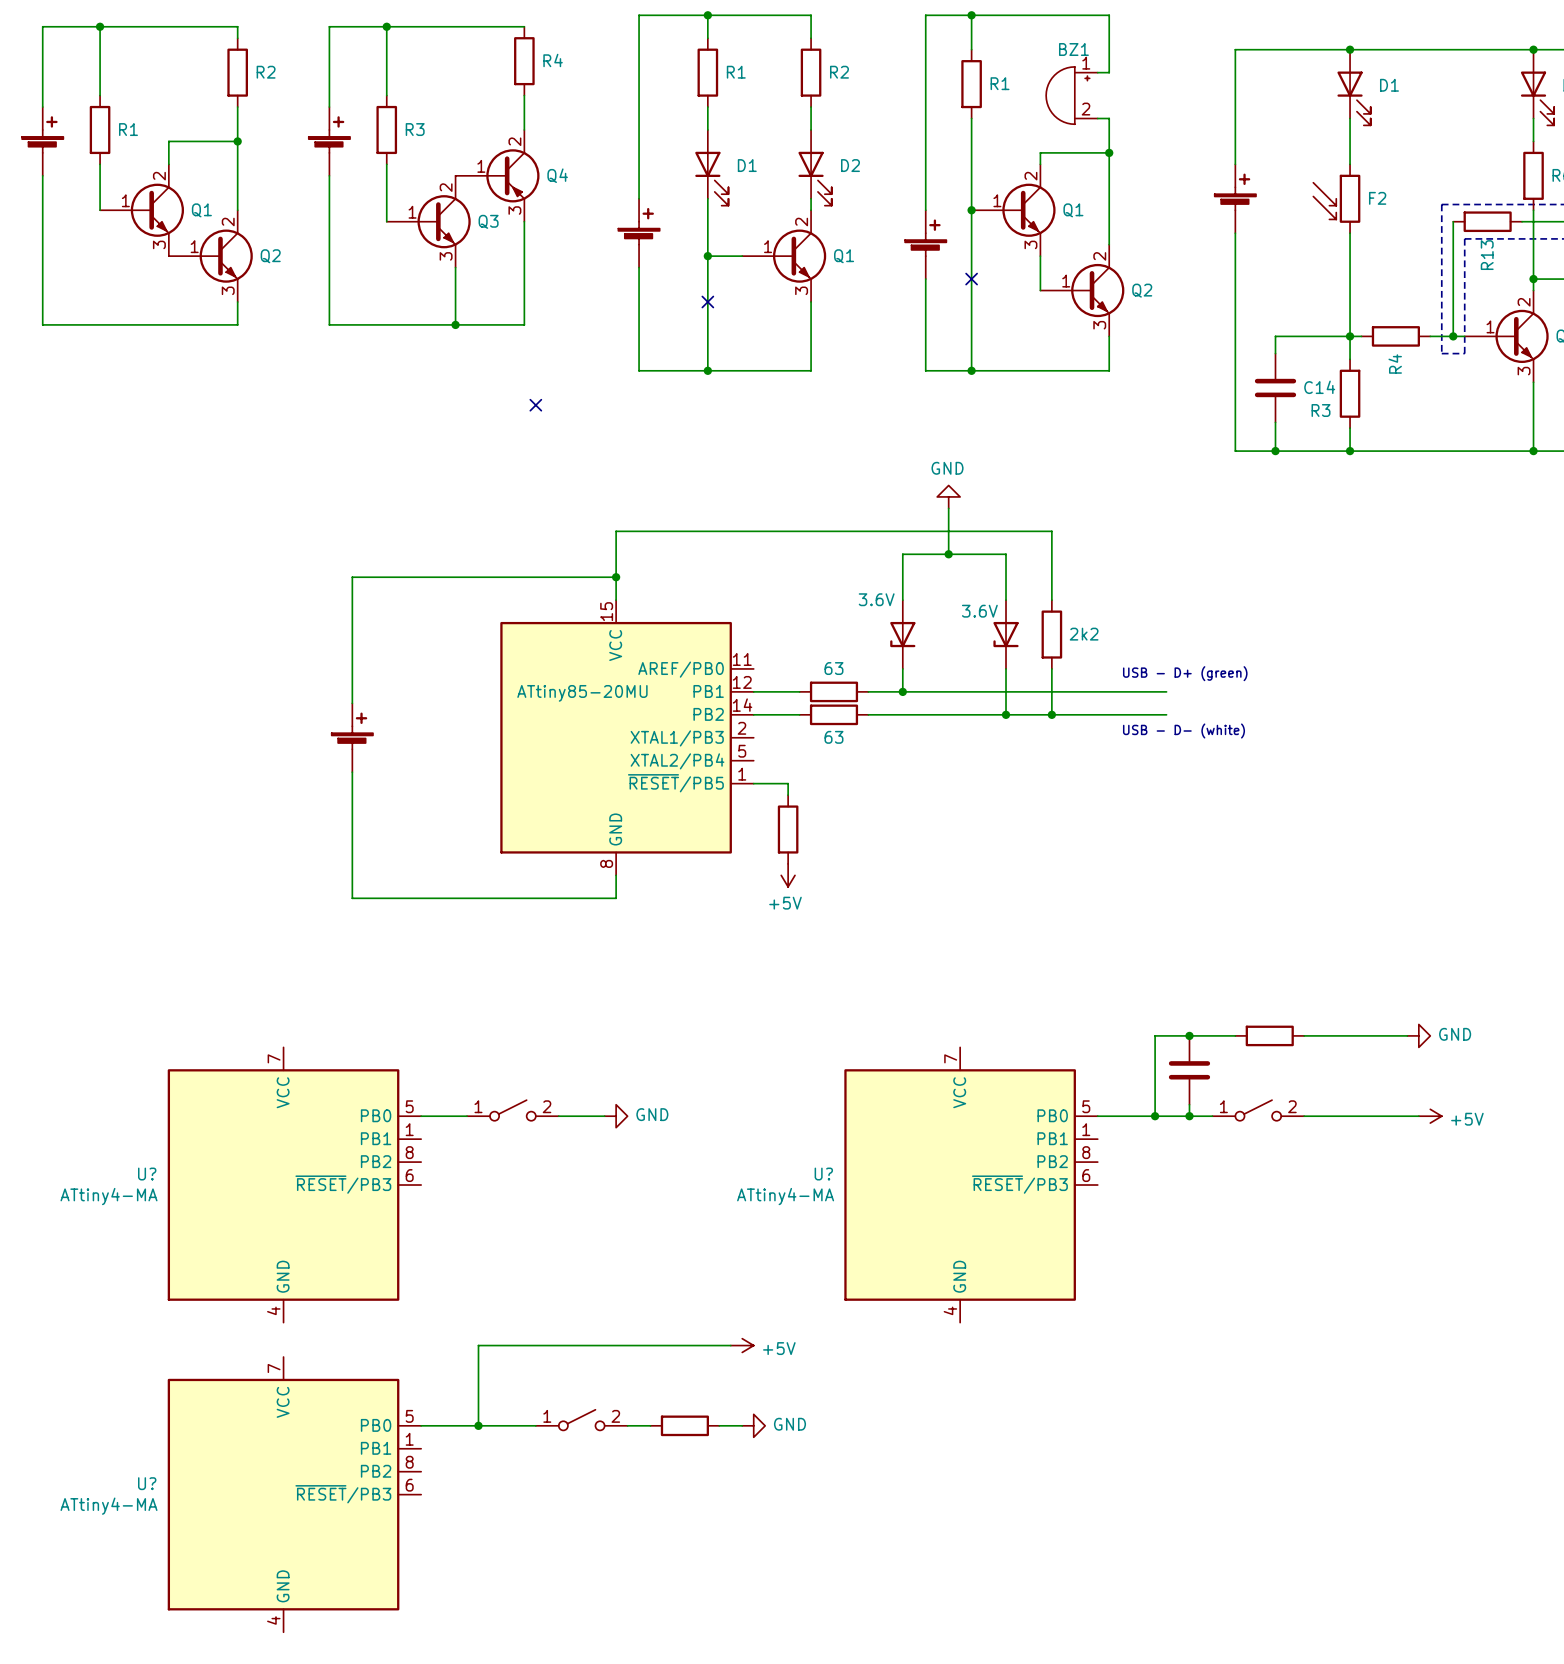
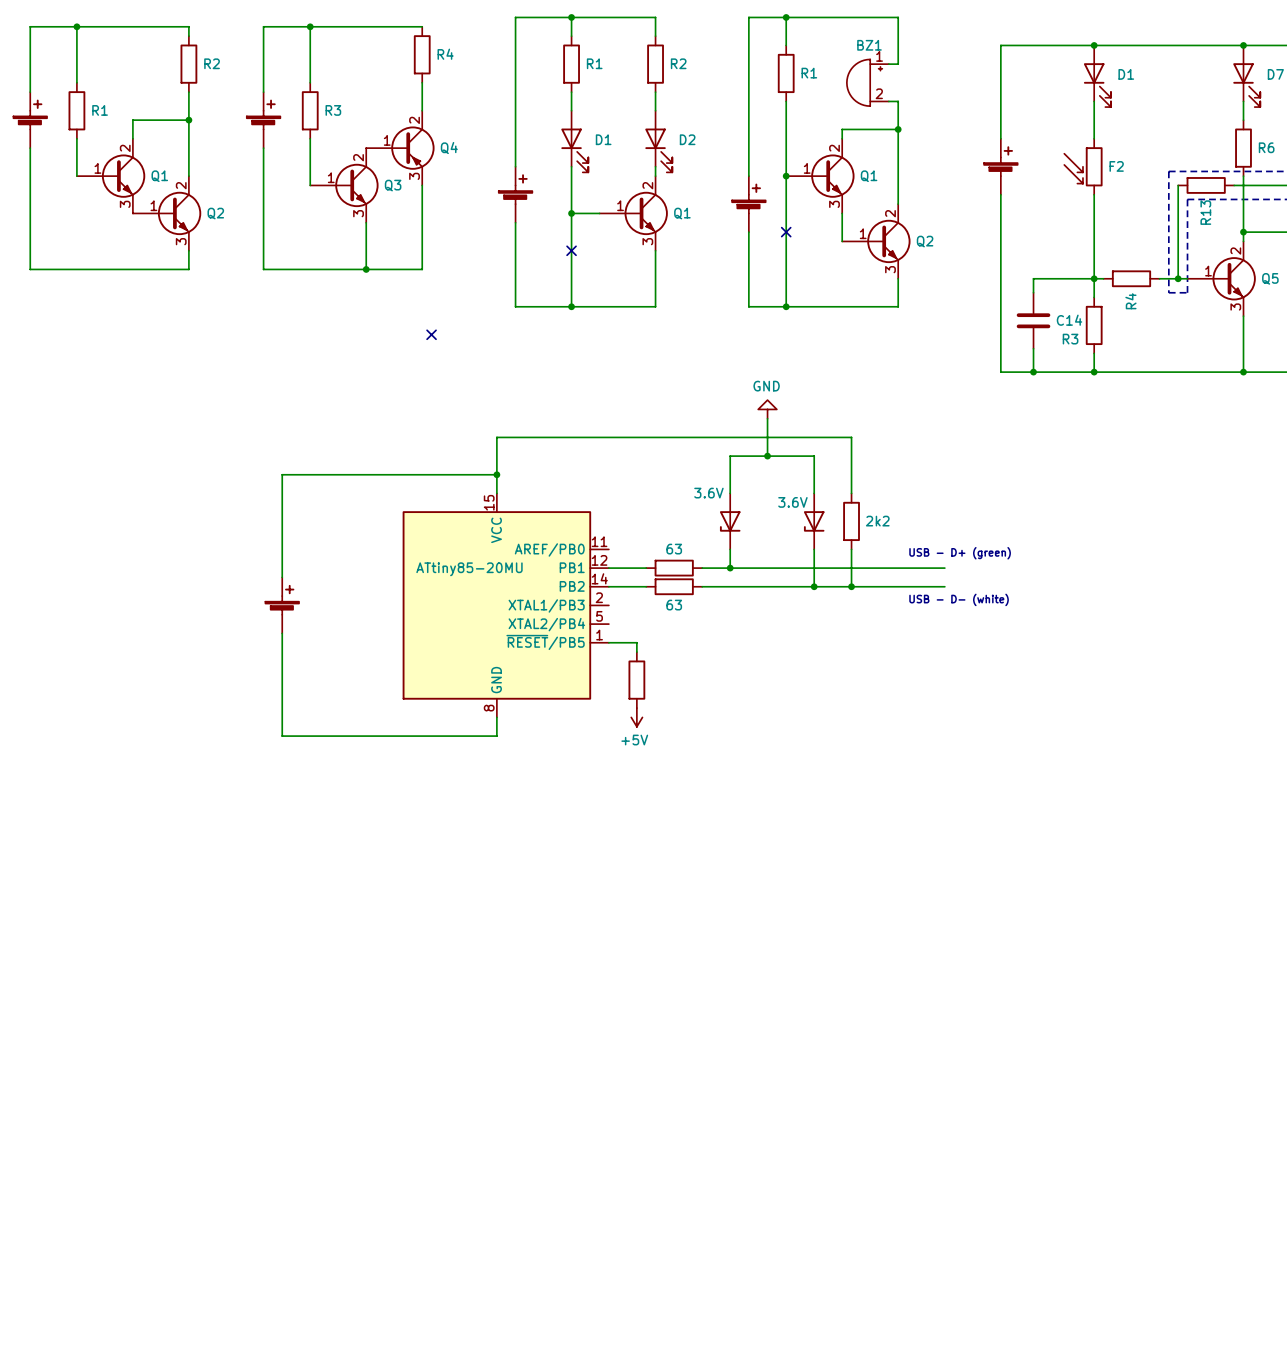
junction: (1189, 1035) -> none
wire: (1235, 1035) (1155, 1035) (1155, 1116) -> none
part: (1269, 1035) -> none
wire: (1304, 1035) (1407, 1035) -> none
power symbol: GND (1418, 1035) -> none
part: (1189, 1070) -> none
wire: (1189, 1104) (1189, 1116) -> none
part: (512, 1110) -> none
part: (1258, 1110) -> none
wire: (421, 1116) (467, 1116) -> none
wire: (558, 1116) (604, 1116) -> none
power symbol: GND (616, 1116) -> none
wire: (1097, 1116) (1212, 1116) -> none
junction: (1155, 1116) -> none
junction: (1189, 1116) -> none
wire: (1304, 1116) (1418, 1116) -> none
power symbol: +5V (1430, 1116) -> none
U?: ATtiny4-MA (294, 1185) -> none
U?: ATtiny4-MA (971, 1185) -> none
wire: (730, 1345) (478, 1345) (478, 1425) -> none
power symbol: +5V (742, 1345) -> none
part: (581, 1420) -> none
wire: (421, 1425) (535, 1425) -> none
junction: (478, 1425) -> none
wire: (627, 1425) (650, 1425) -> none
part: (684, 1425) -> none
wire: (719, 1425) (742, 1425) -> none
power symbol: GND (753, 1425) -> none
U?: ATtiny4-MA (294, 1494) -> none

